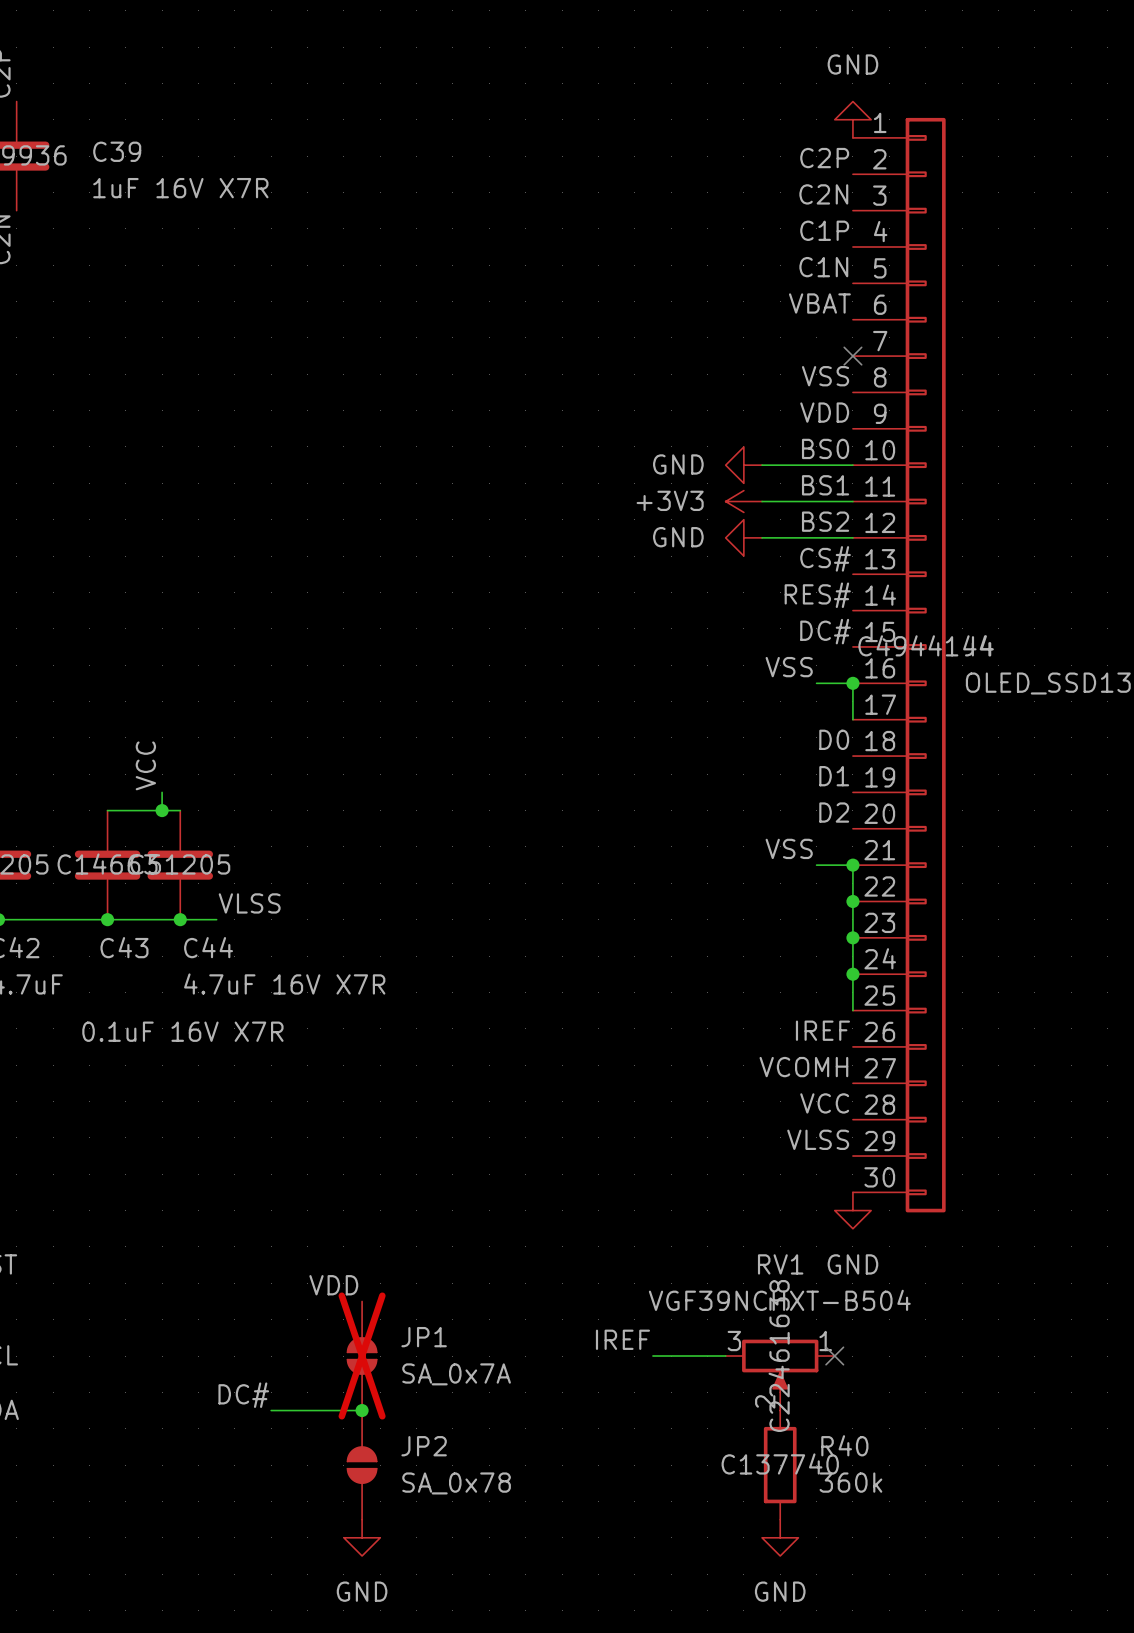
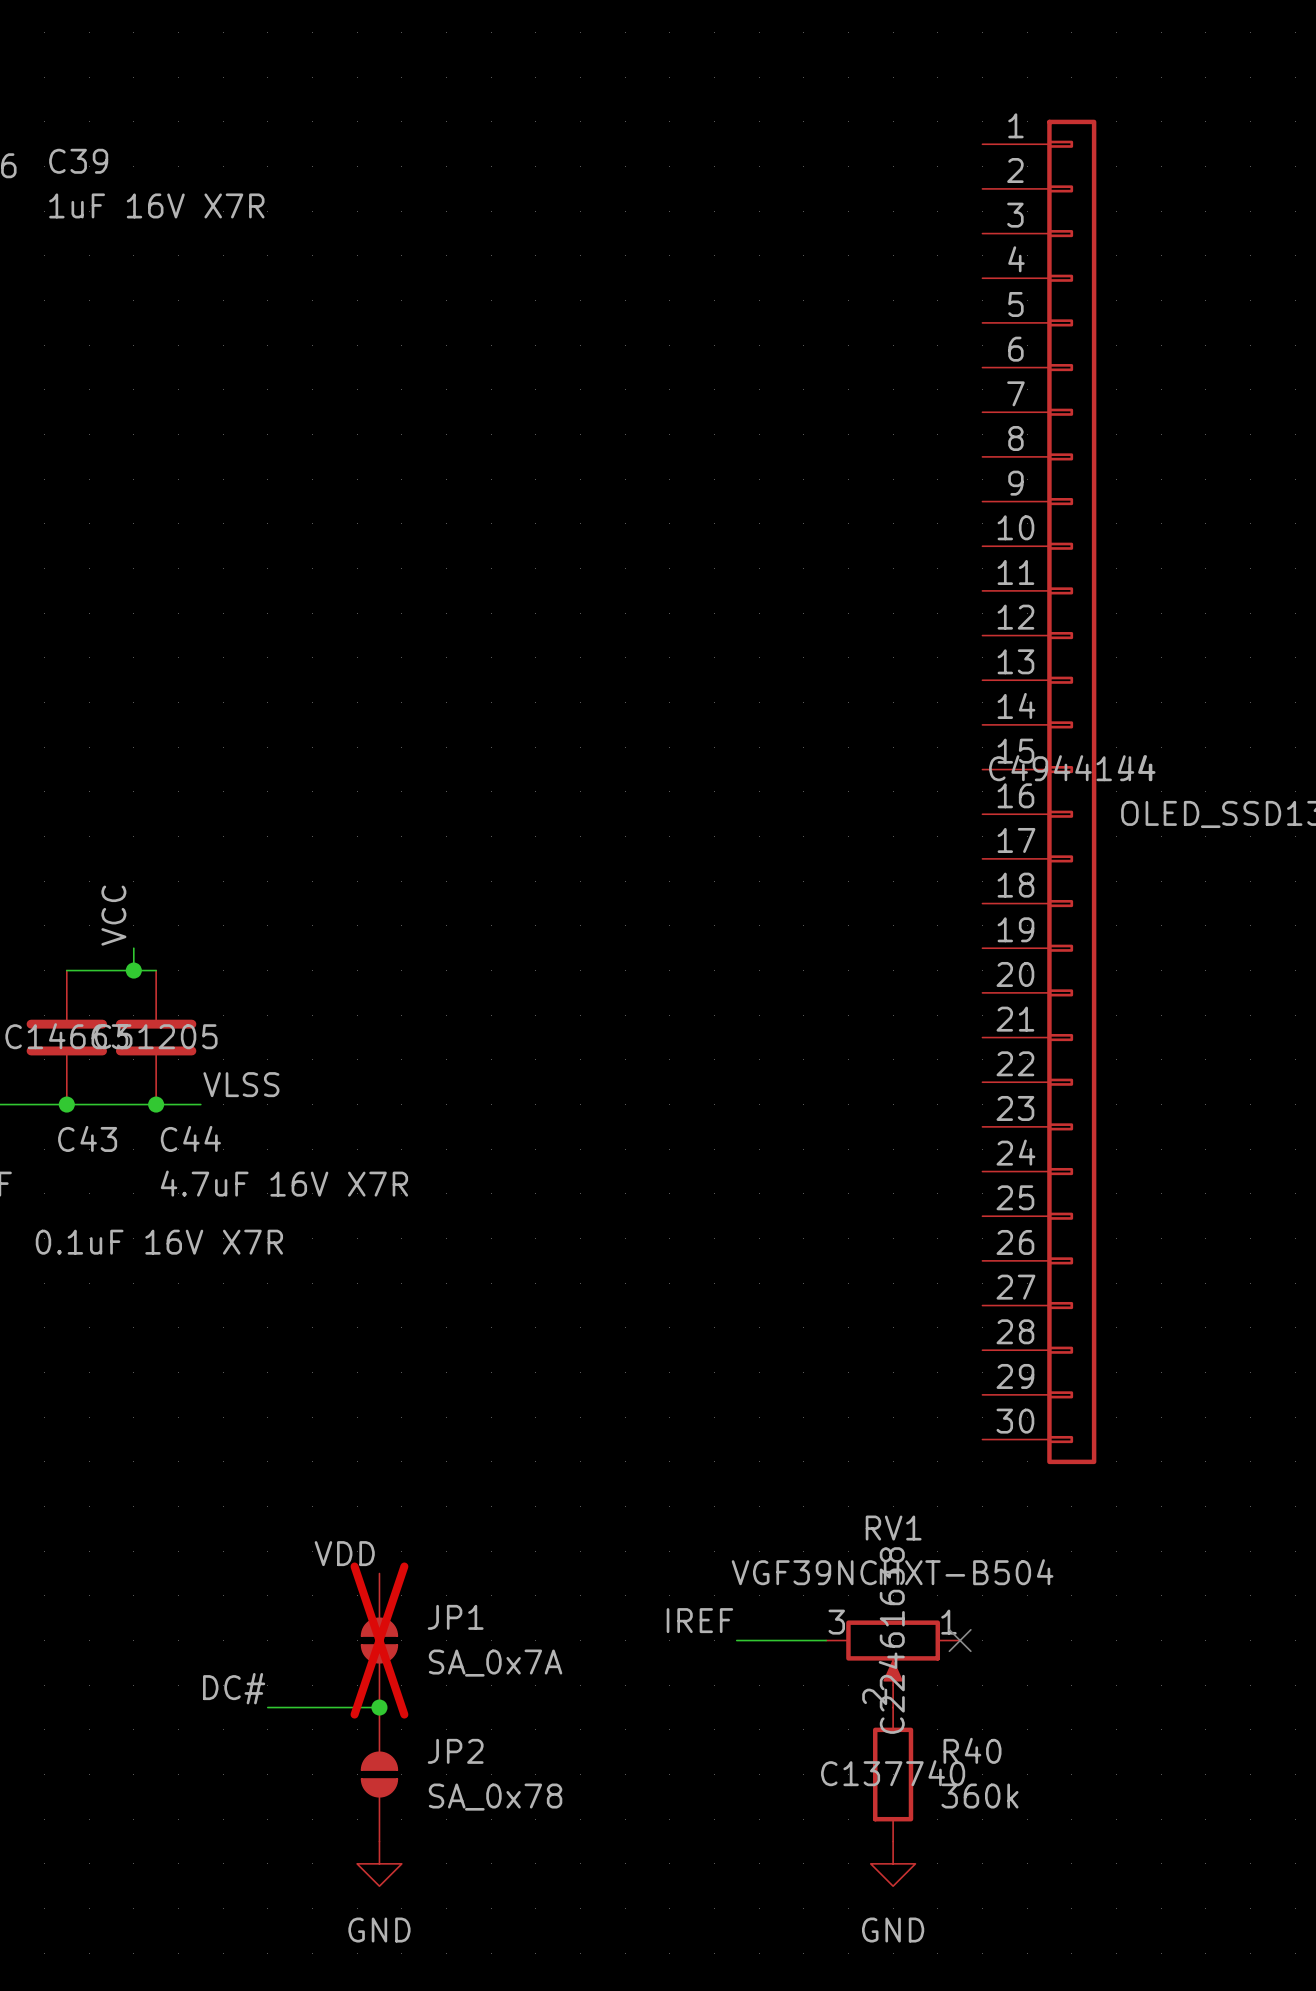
power symbol: GND (852, 119) -> none
label: C2P (824, 158) -> none
label: C2N (823, 194) -> none
label: C1P (824, 230) -> none
label: C1N (823, 267) -> none
label: VBAT (819, 303) -> none
no-connect mark: (852, 356) -> none
label: VSS (825, 376) -> none
label: VDD (824, 412) -> none
label: BS0 (825, 448) -> none
power symbol: GND (743, 465) -> none
wire: (762, 465) (852, 465) -> none
label: BS1 (825, 485) -> none
power symbol: +3V3 (743, 501) -> none
wire: (762, 501) (852, 501) -> none
label: BS2 (825, 521) -> none
power symbol: GND (743, 537) -> none
wire: (762, 537) (852, 537) -> none
label: CS# (825, 558) -> none
label: RES# (817, 595) -> none
label: DC# (825, 631) -> none
label: VSS (789, 667) -> none
wire: (816, 683) (852, 683) (852, 719) -> none
junction: (852, 683) -> none
label: D0 (834, 739) -> none
label: D1 (834, 776) -> none
label: D2 (834, 812) -> none
label: VSS (789, 848) -> none
wire: (816, 865) (852, 865) (852, 1010) -> none
junction: (852, 865) -> none
junction: (852, 901) -> none
junction: (852, 937) -> none
junction: (852, 974) -> none
label: IREF (822, 1030) -> none
label: VCOMH (803, 1067) -> none
label: VCC (824, 1103) -> none
label: VLSS (818, 1139) -> none
power symbol: GND (852, 1210) -> none

